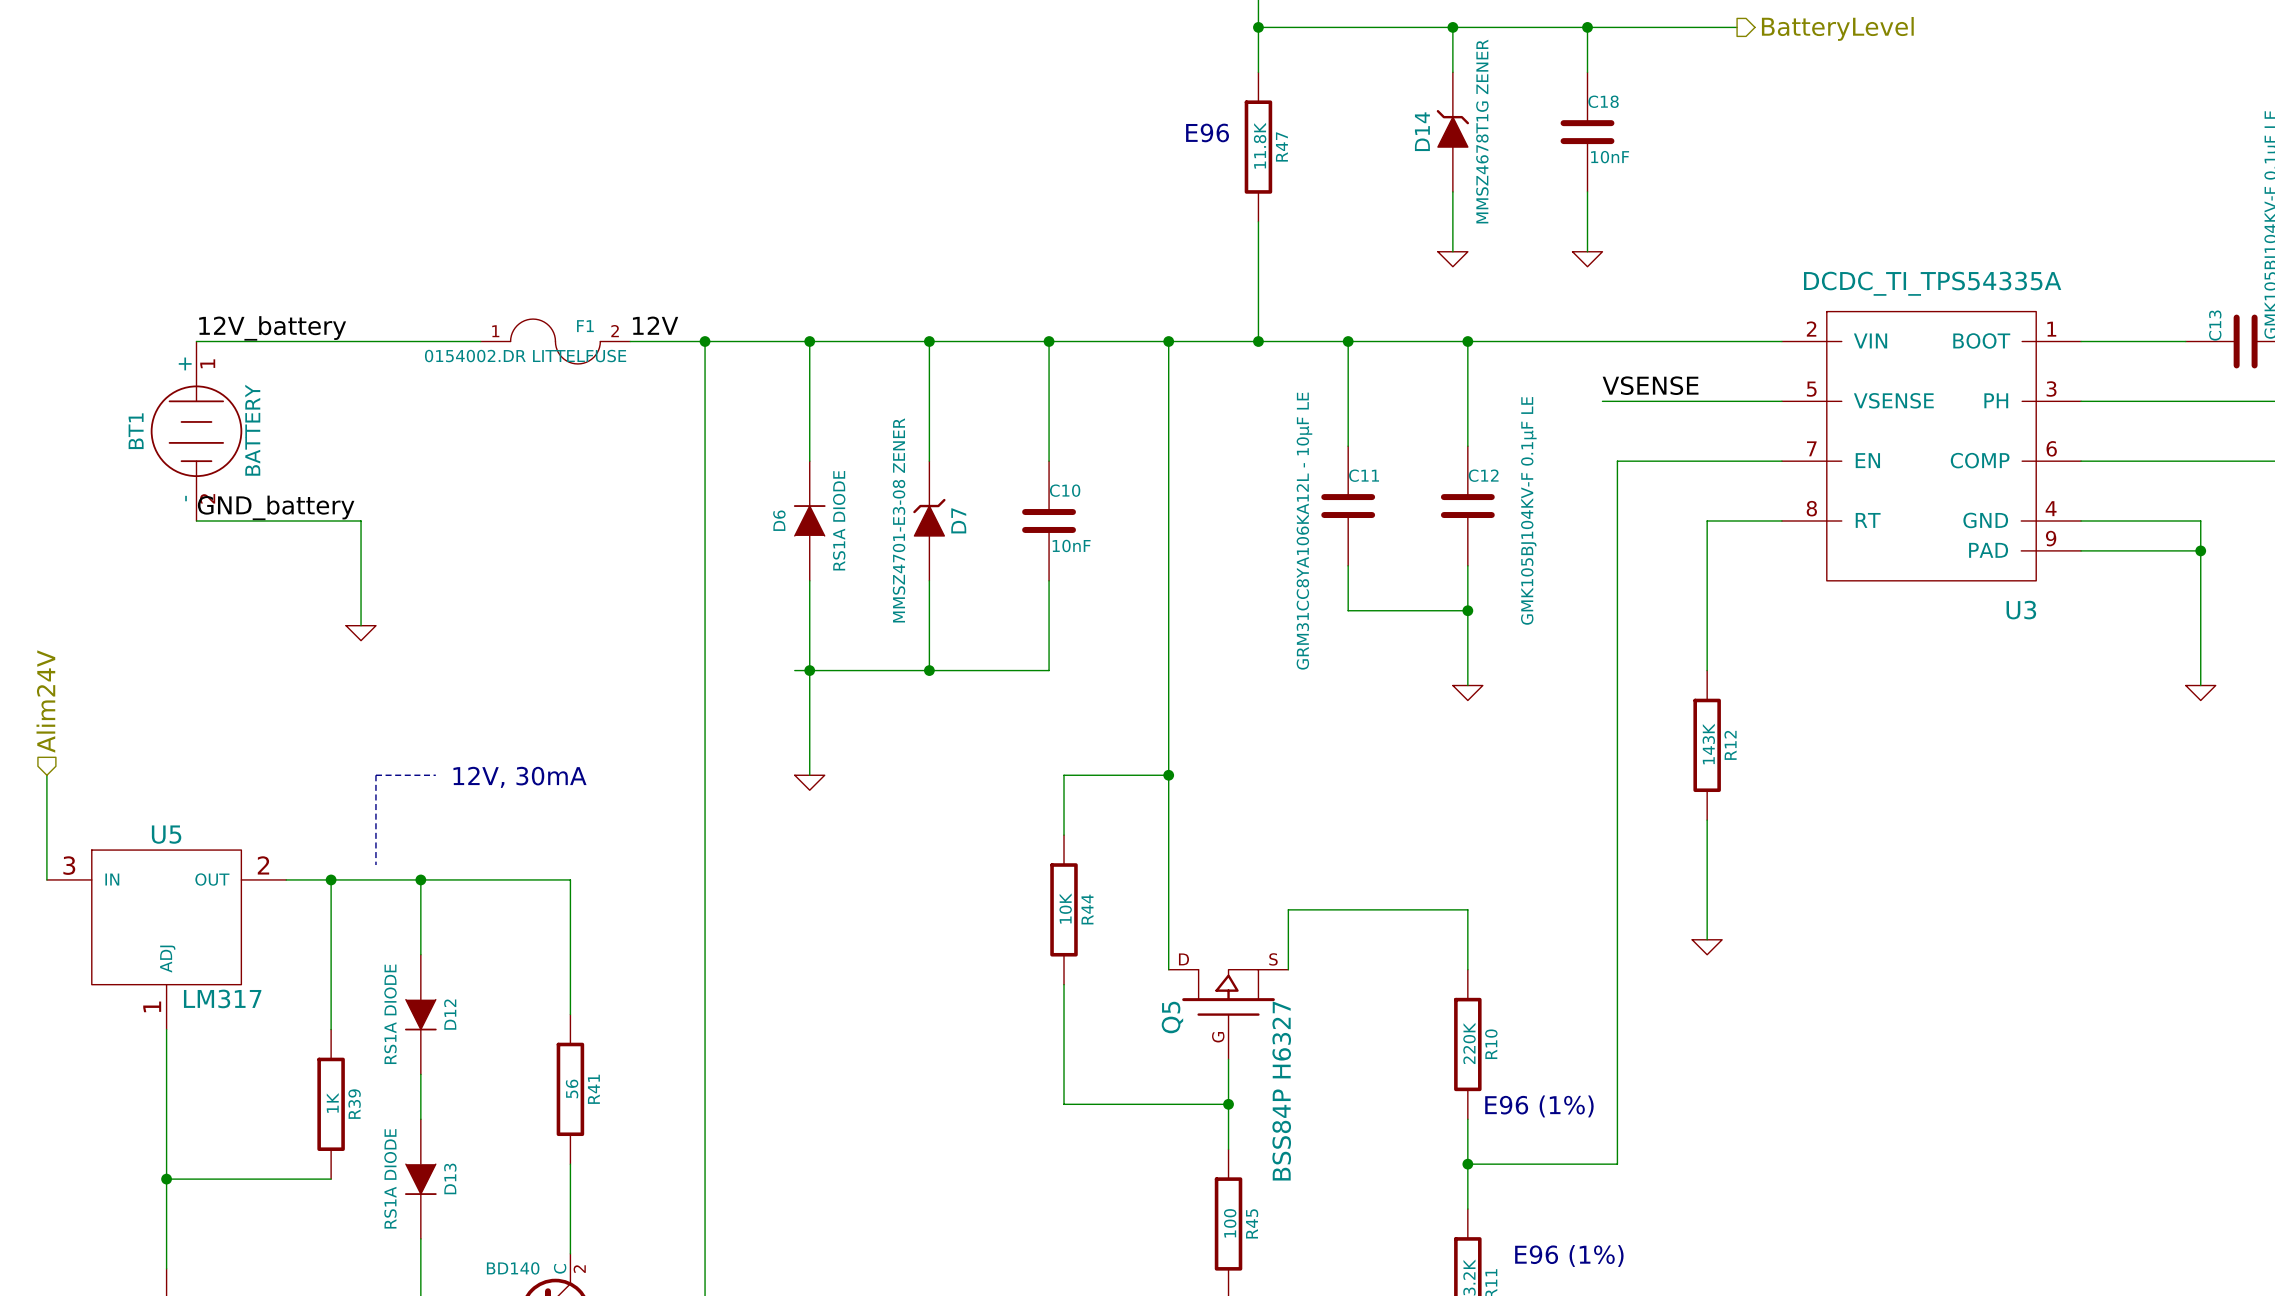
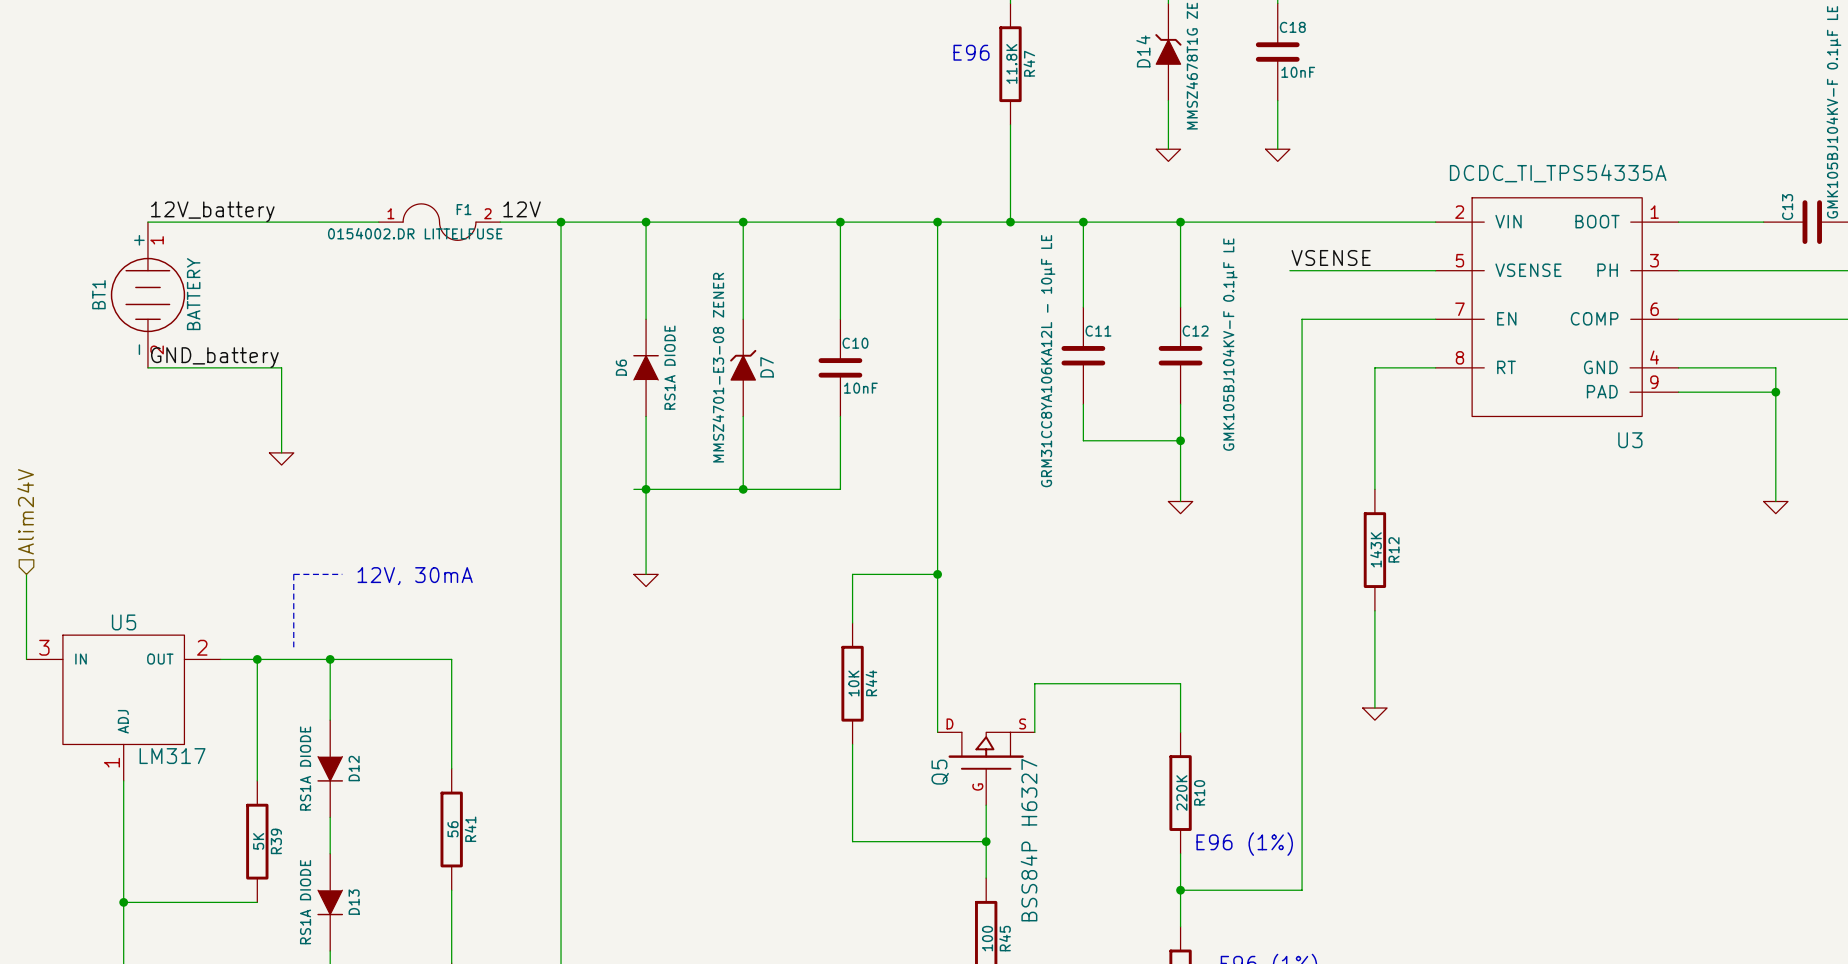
R39 value: 1K (332, 1102) -> 5K (258, 841)

